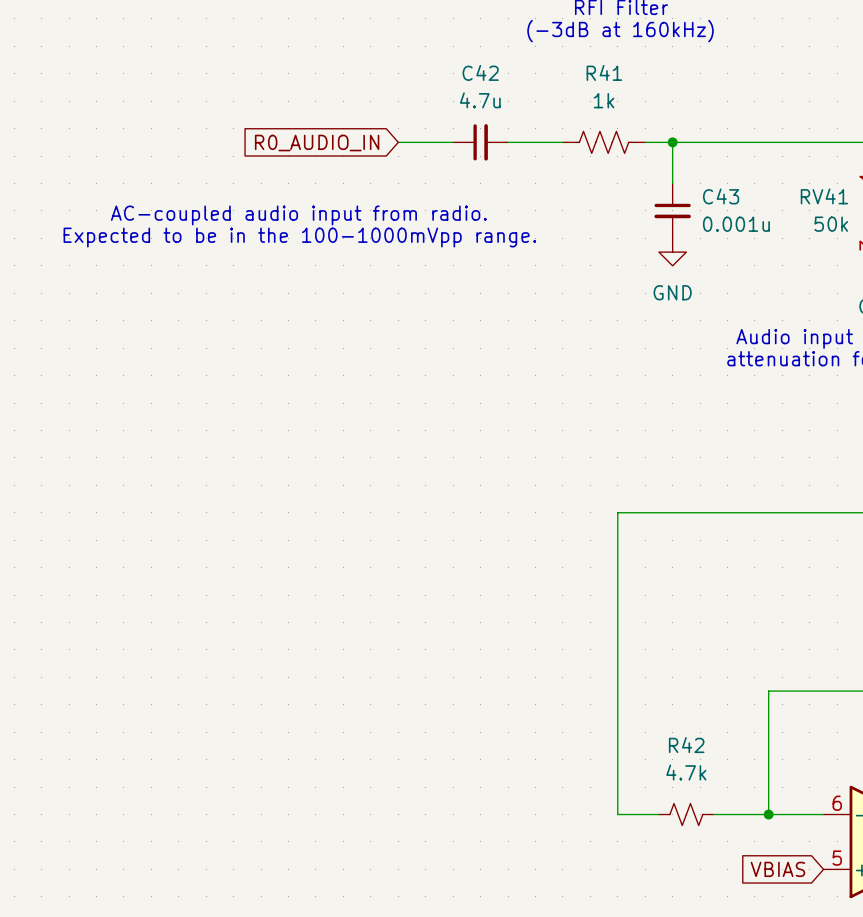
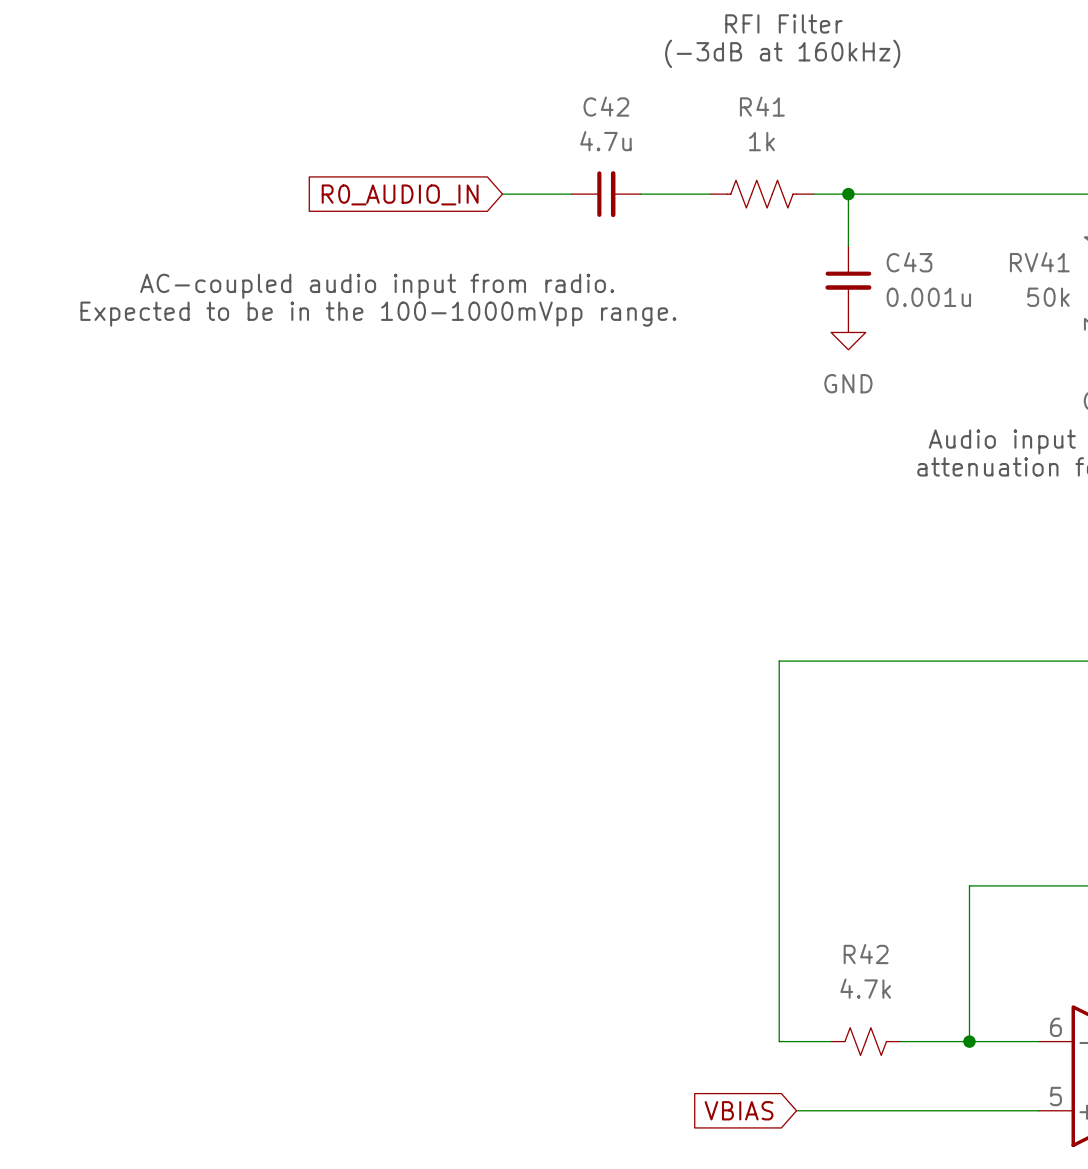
wire: none -> (796, 1110) (1038, 1110)
global label position: VBIAS (777, 869) -> VBIAS (739, 1110)

